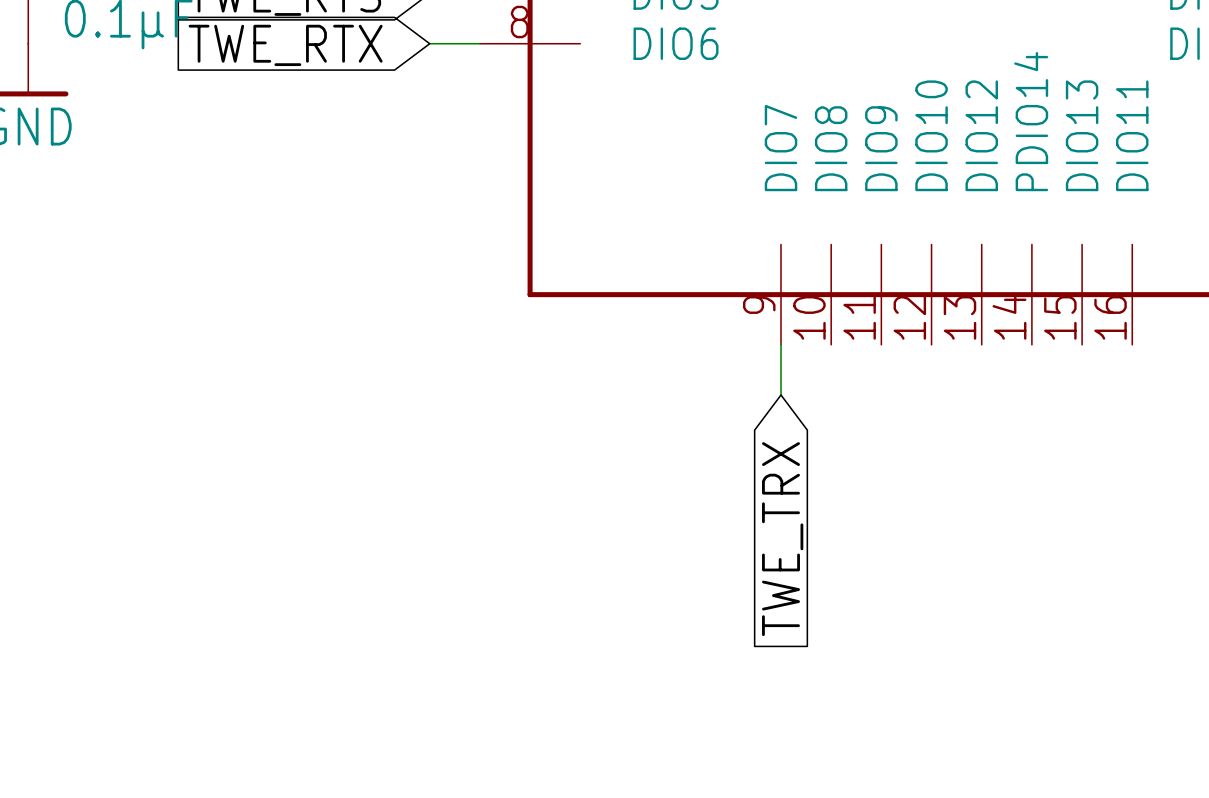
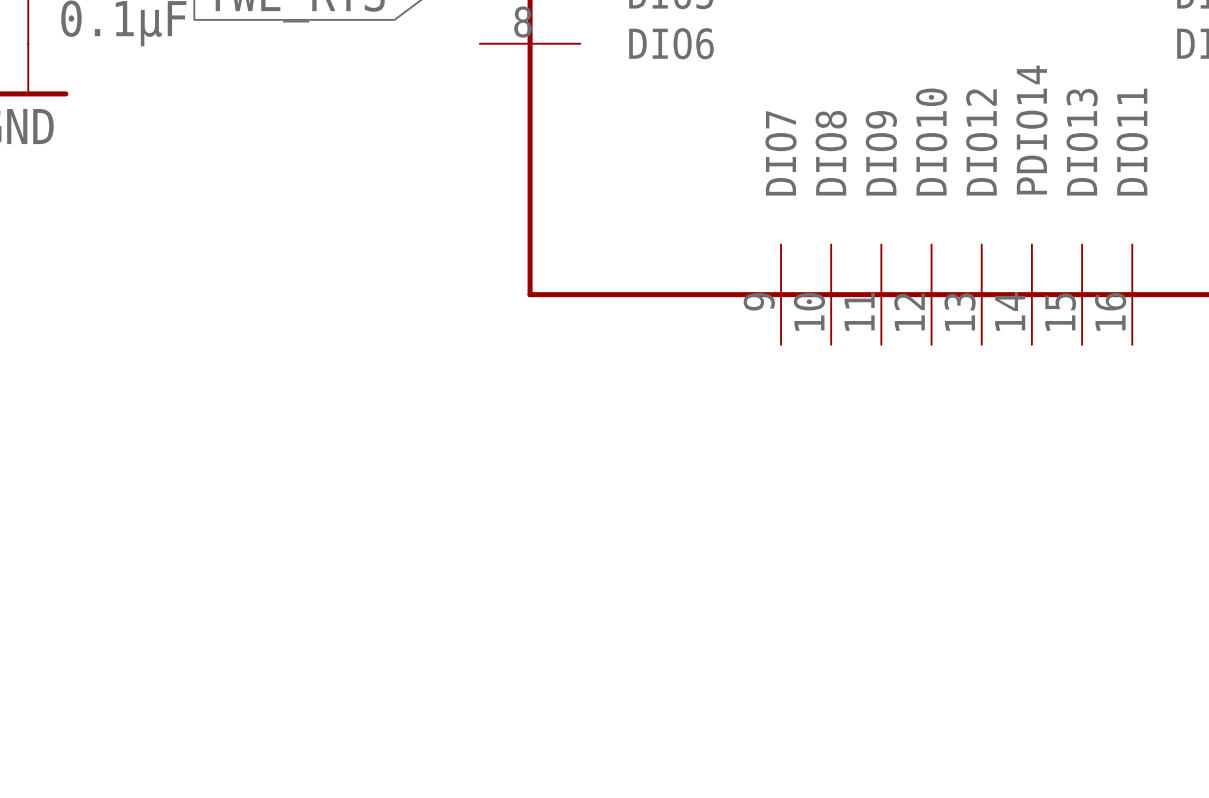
wire: (429, 43) (479, 43) -> none
global label: TWE_RTX (285, 45) -> none
wire: (781, 344) (781, 395) -> none
global label: TWE_TRX (782, 539) -> none

